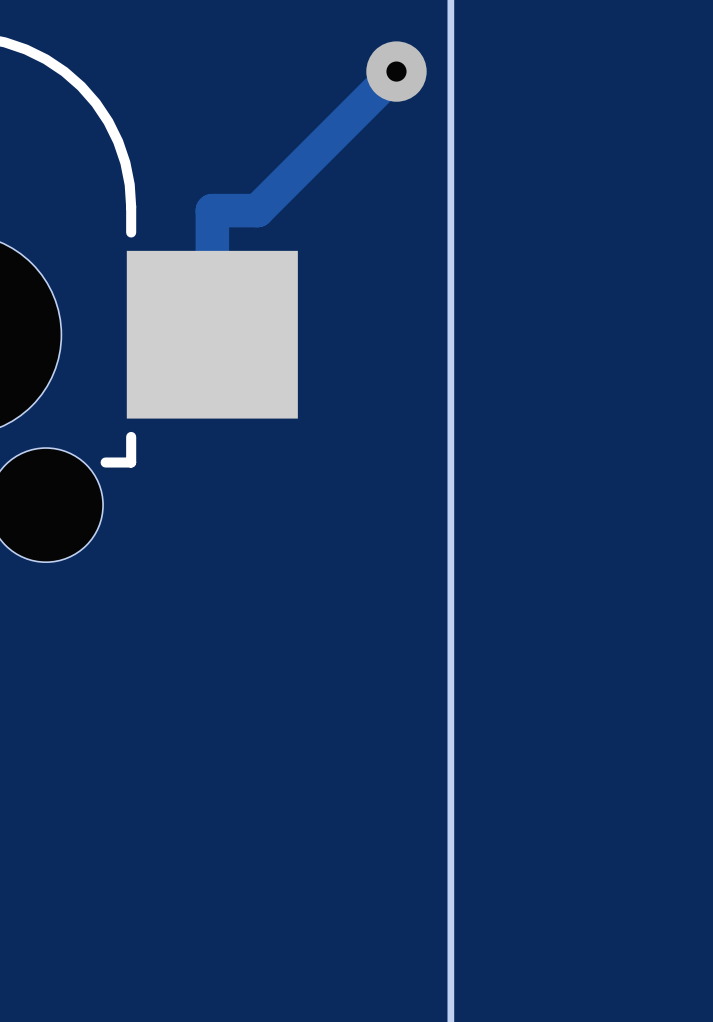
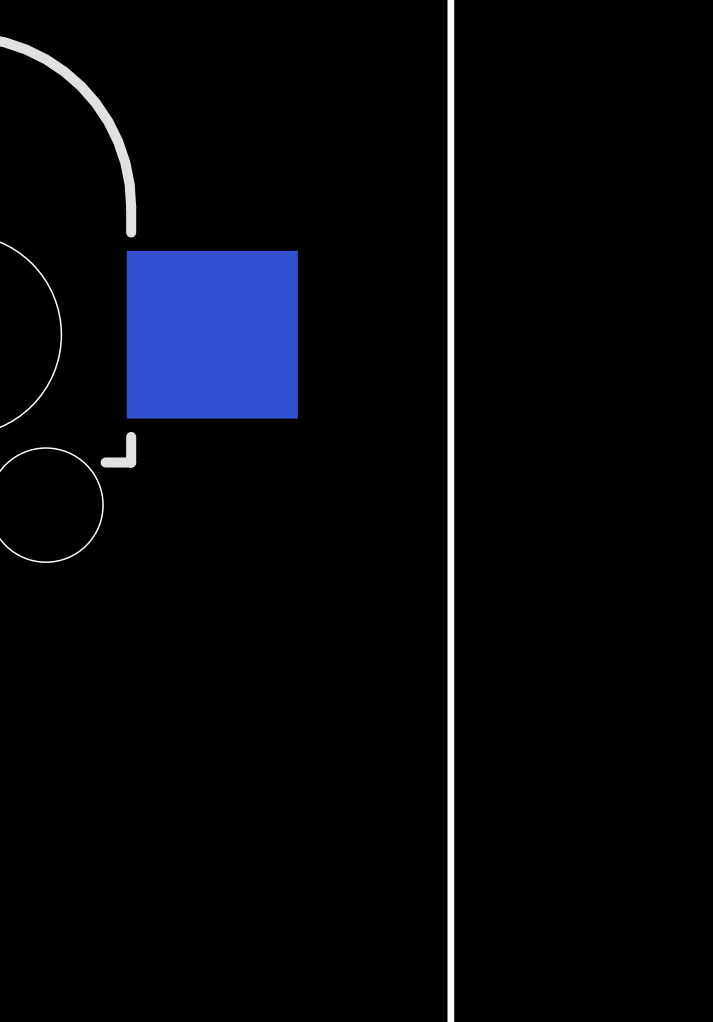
track: (396, 71) (257, 210) (212, 210) (212, 334) -> none
via: (396, 71) -> none

